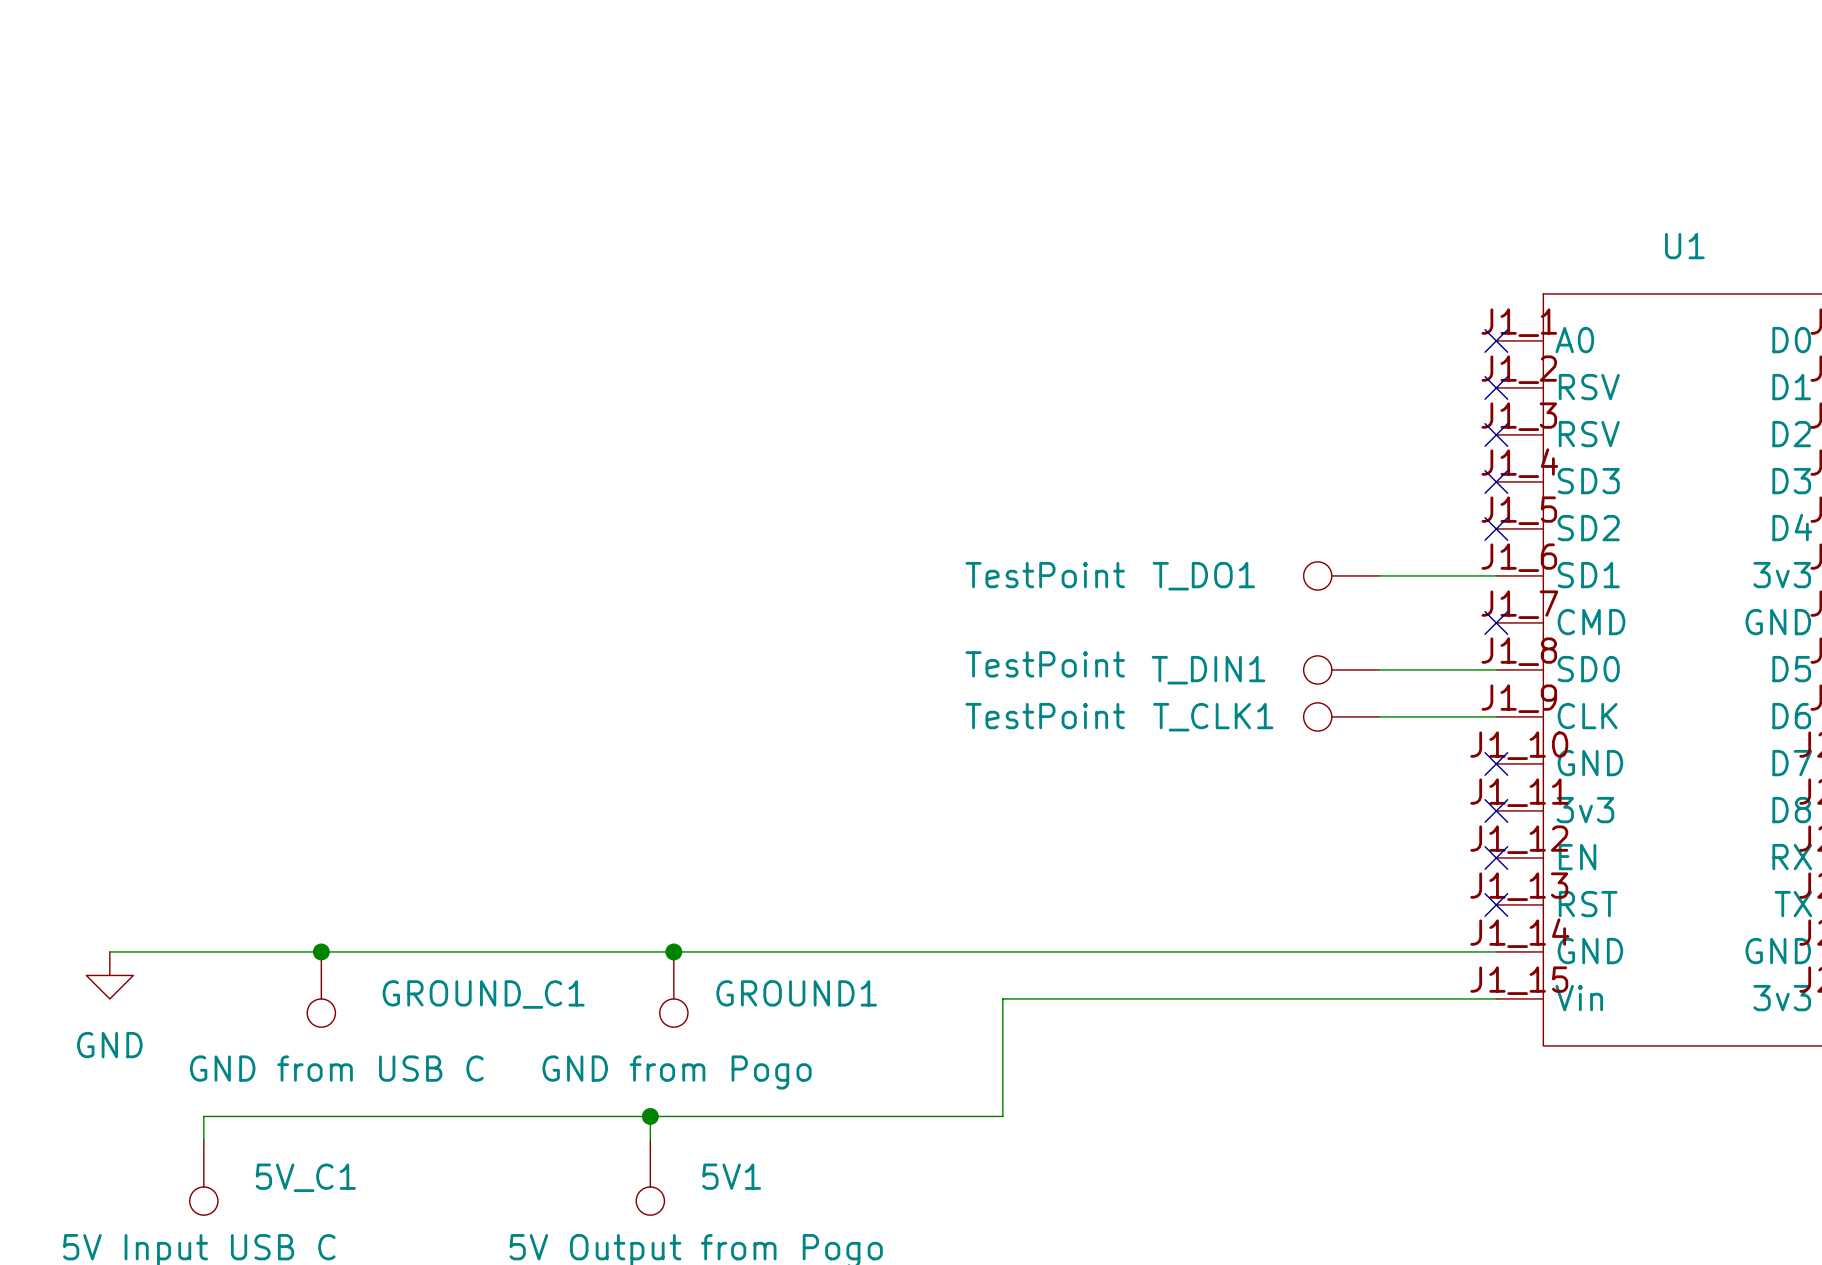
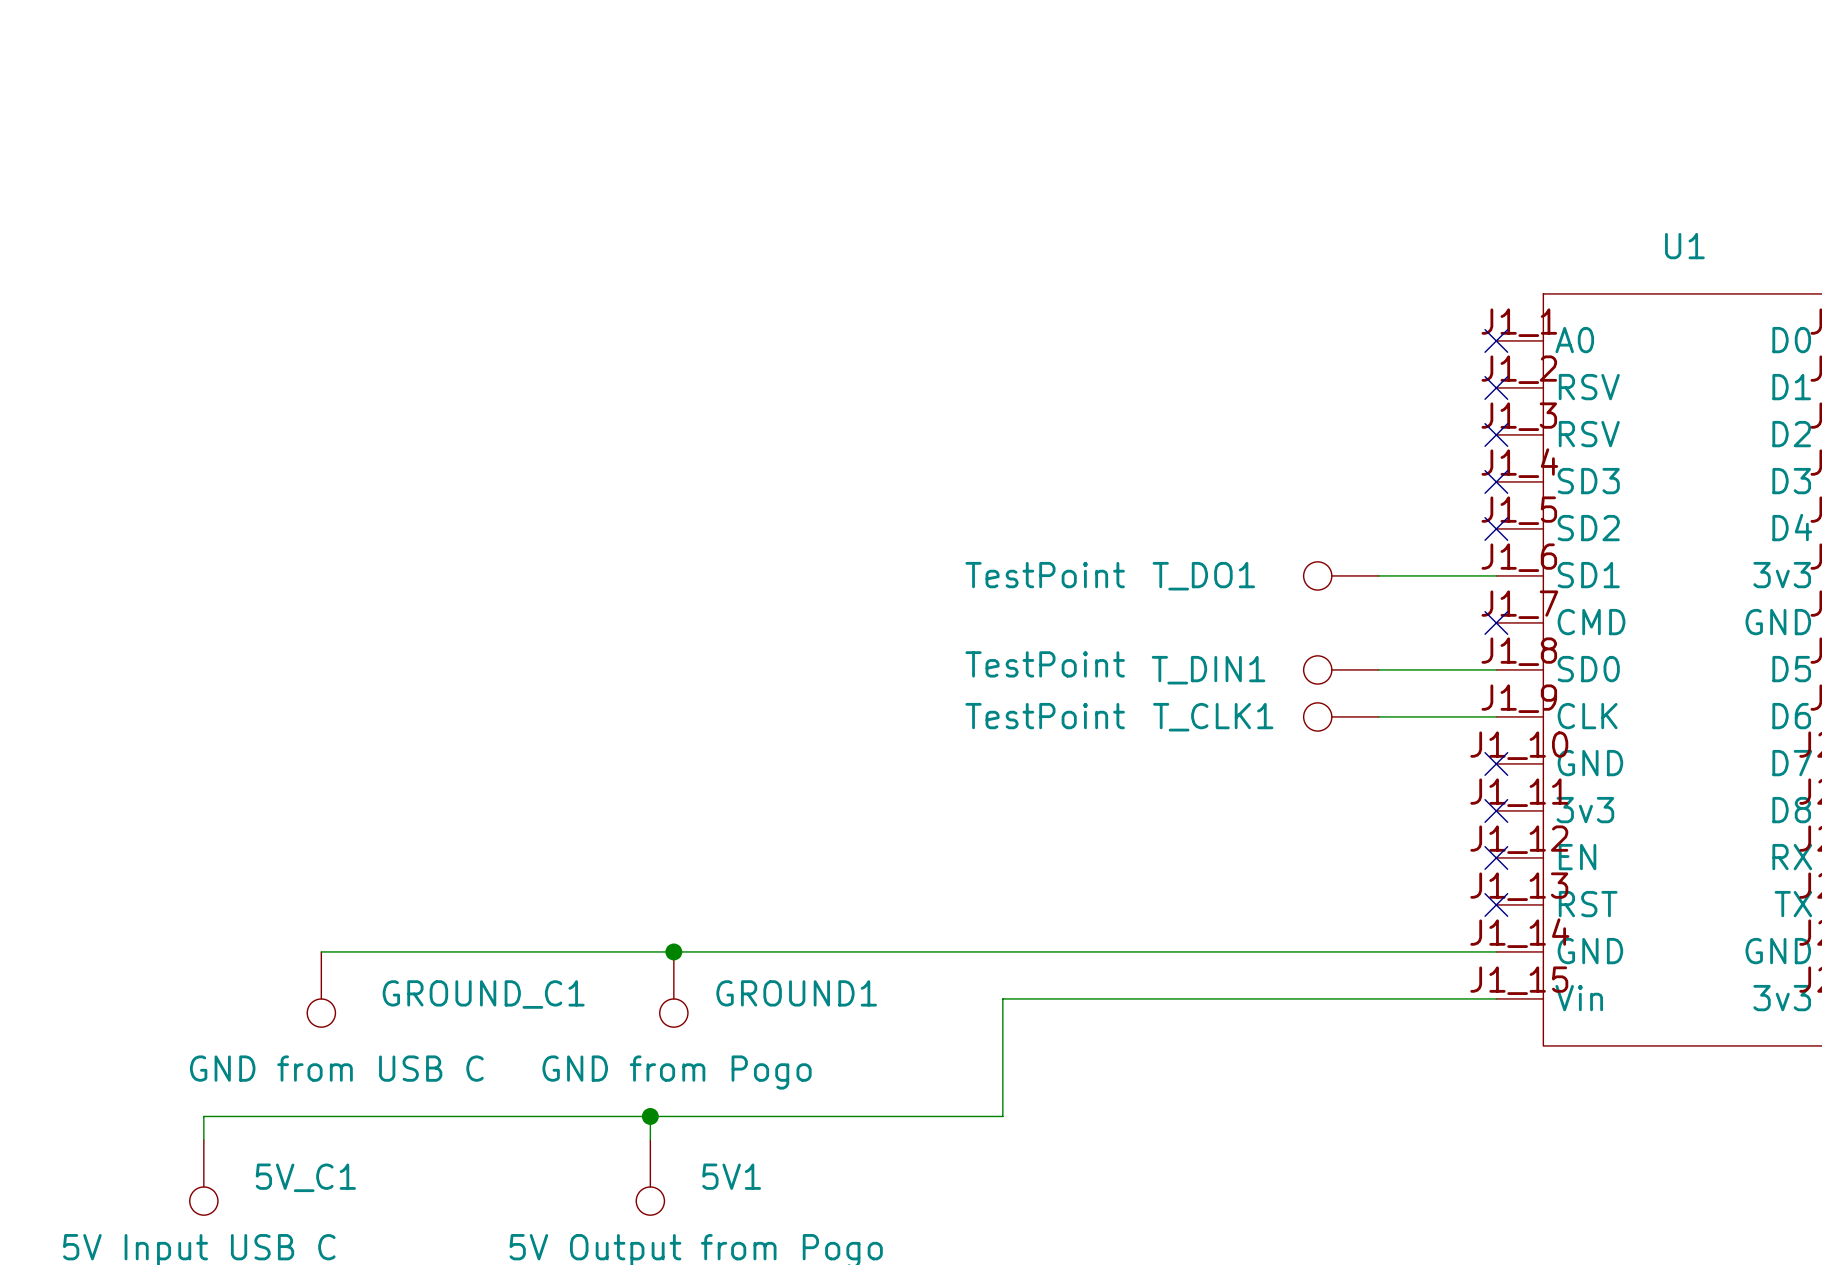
wire: (109, 951) (321, 951) -> none
junction: (321, 951) -> none
power symbol: GND (109, 975) -> none

